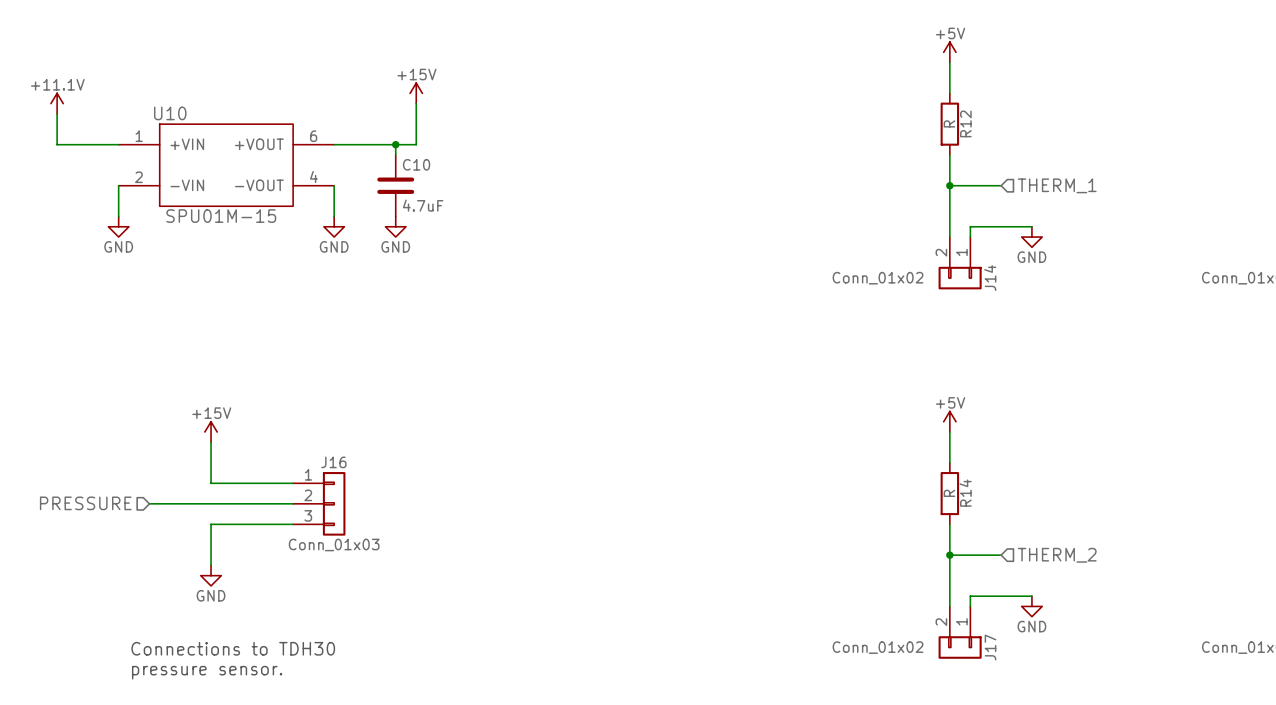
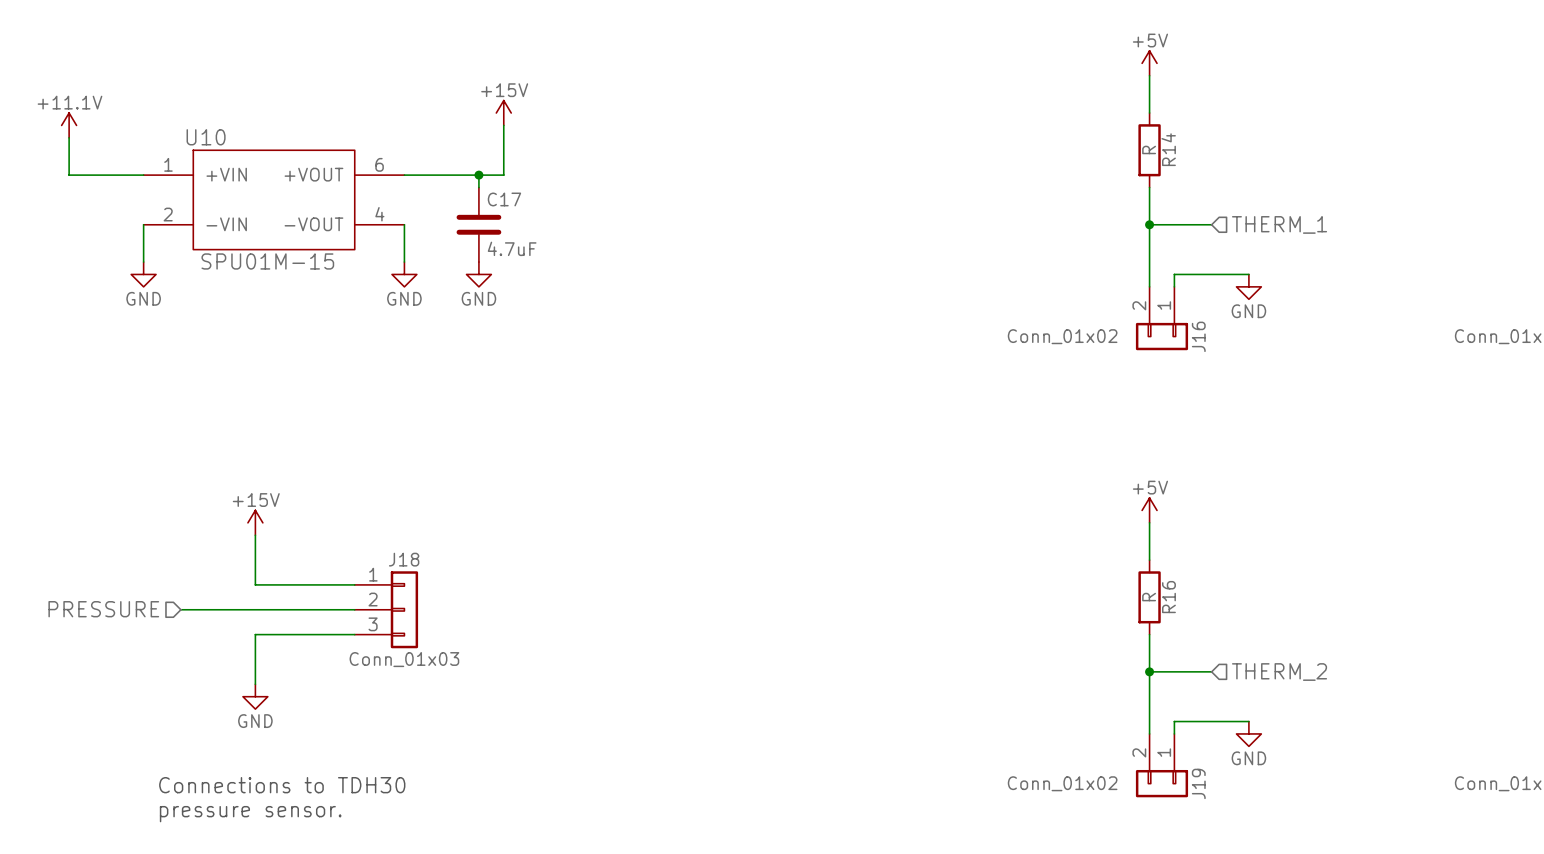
R12 name: R12 (965, 123) -> R14 (1168, 149)
C10 name: C10 (416, 164) -> C17 (504, 199)
J14 name: J14 (990, 278) -> J16 (1198, 336)
J16 name: J16 (333, 462) -> J18 (404, 559)
R14 name: R14 (965, 493) -> R16 (1168, 597)
J17 name: J17 (990, 647) -> J19 (1198, 783)

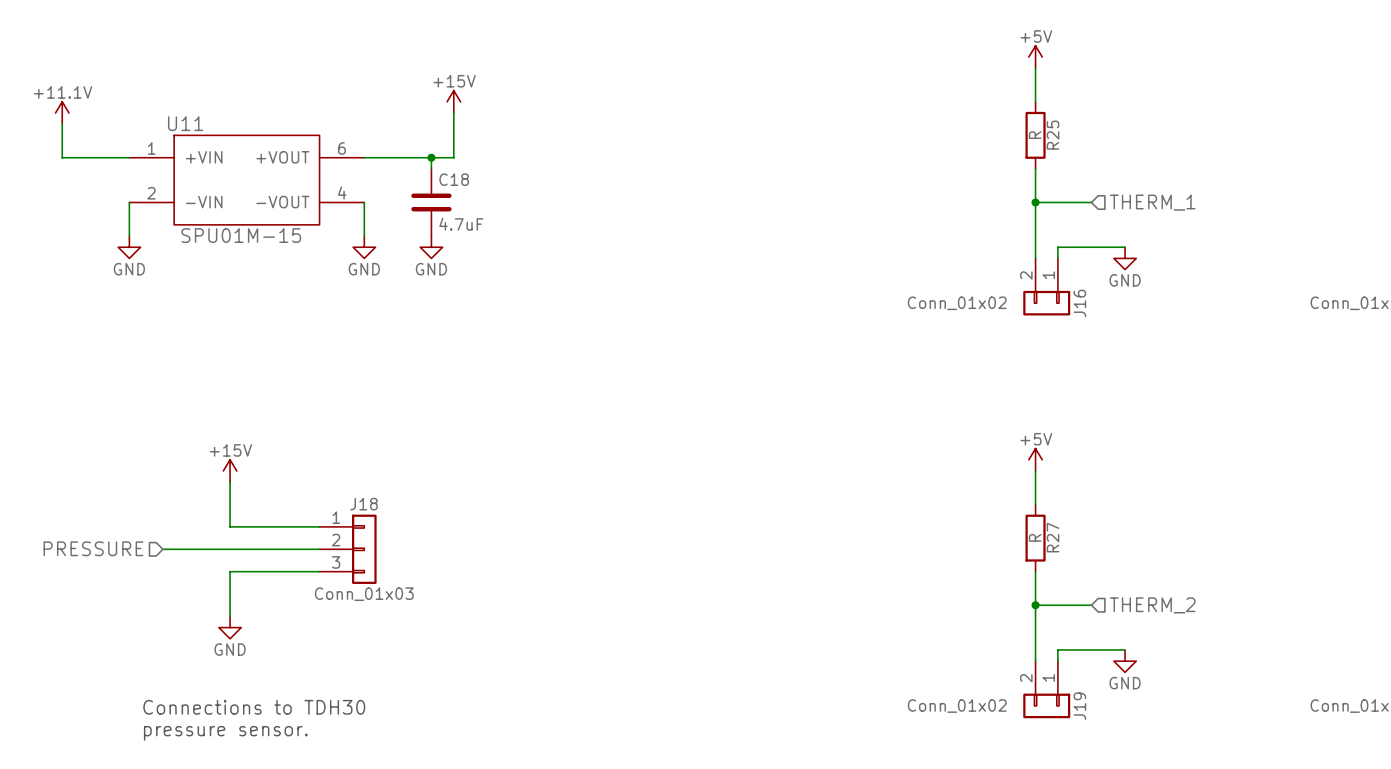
U10 name: U10 (206, 137) -> U11 (185, 123)
R14 name: R14 (1168, 149) -> R25 (1053, 135)
C17 name: C17 (504, 199) -> C18 (454, 179)
R16 name: R16 (1168, 597) -> R27 (1053, 537)

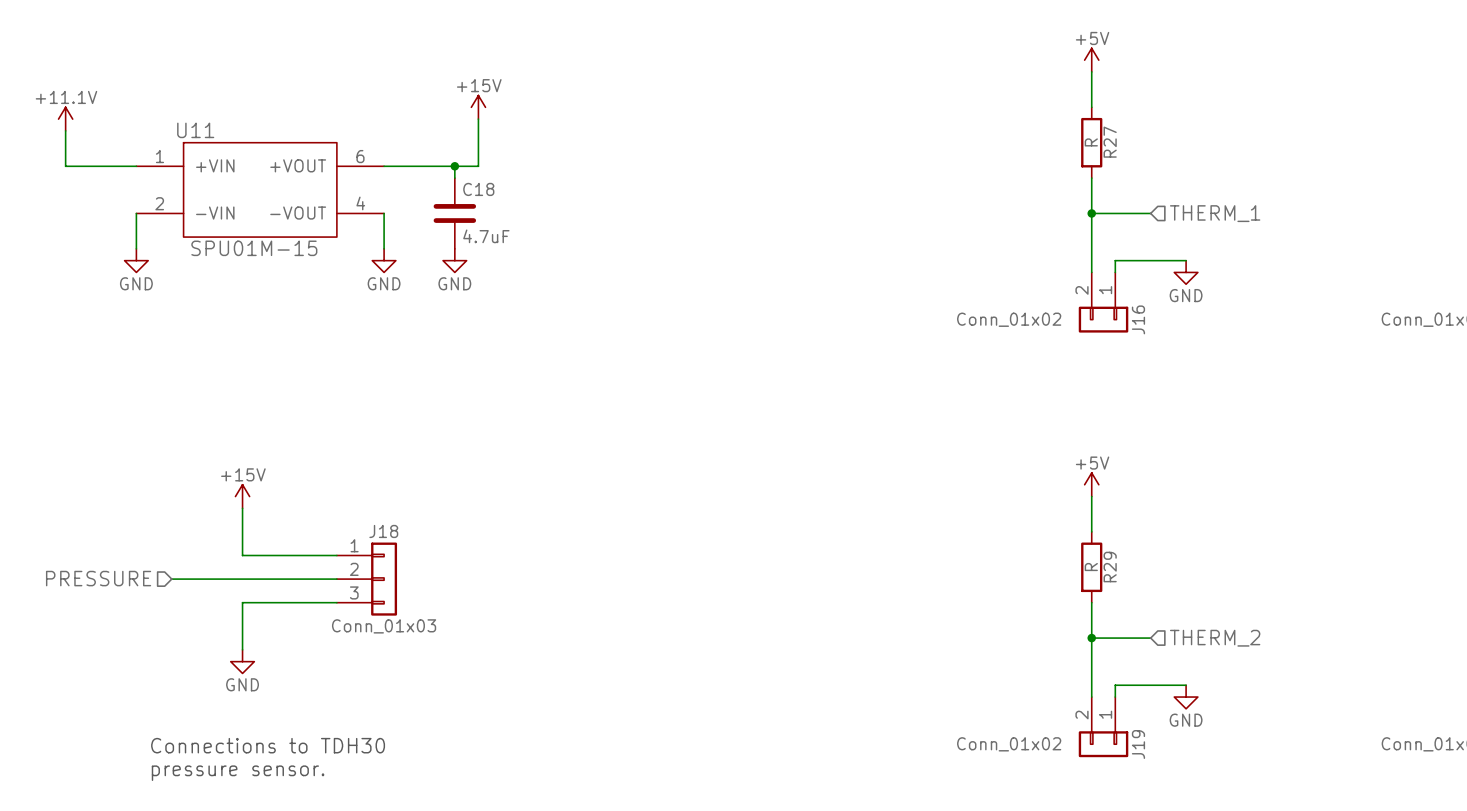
R25 name: R25 (1053, 135) -> R27 (1110, 142)
R27 name: R27 (1053, 537) -> R29 (1110, 567)

